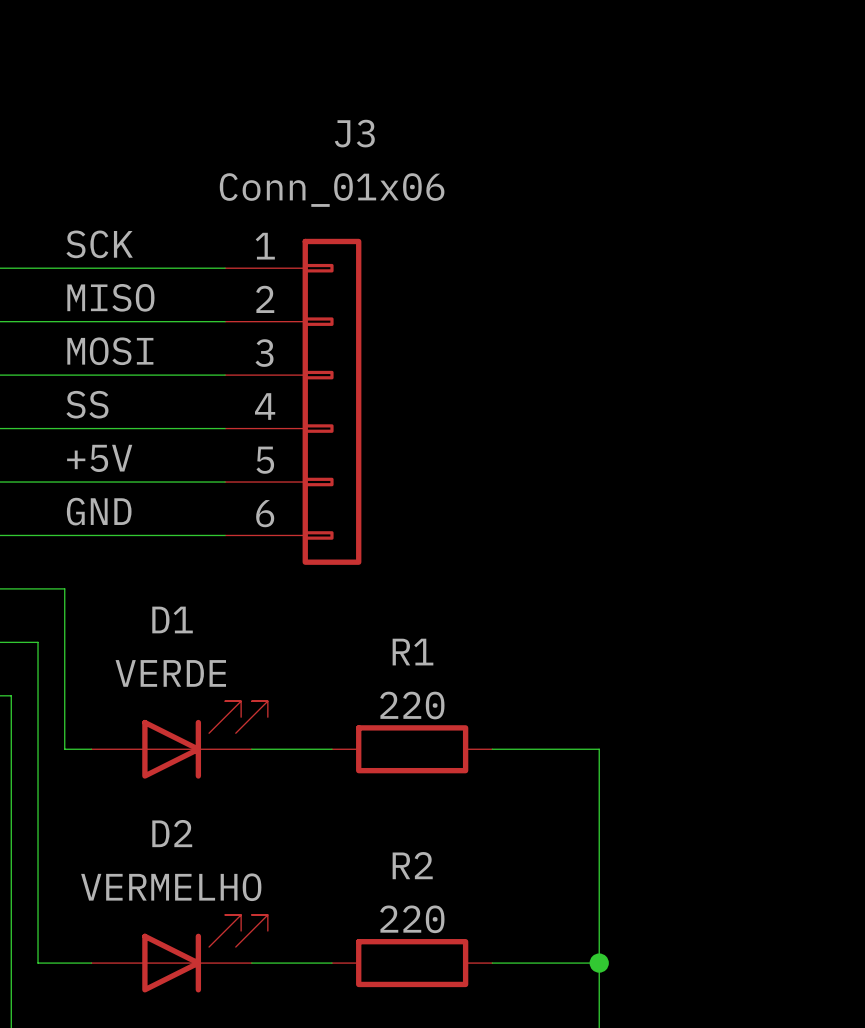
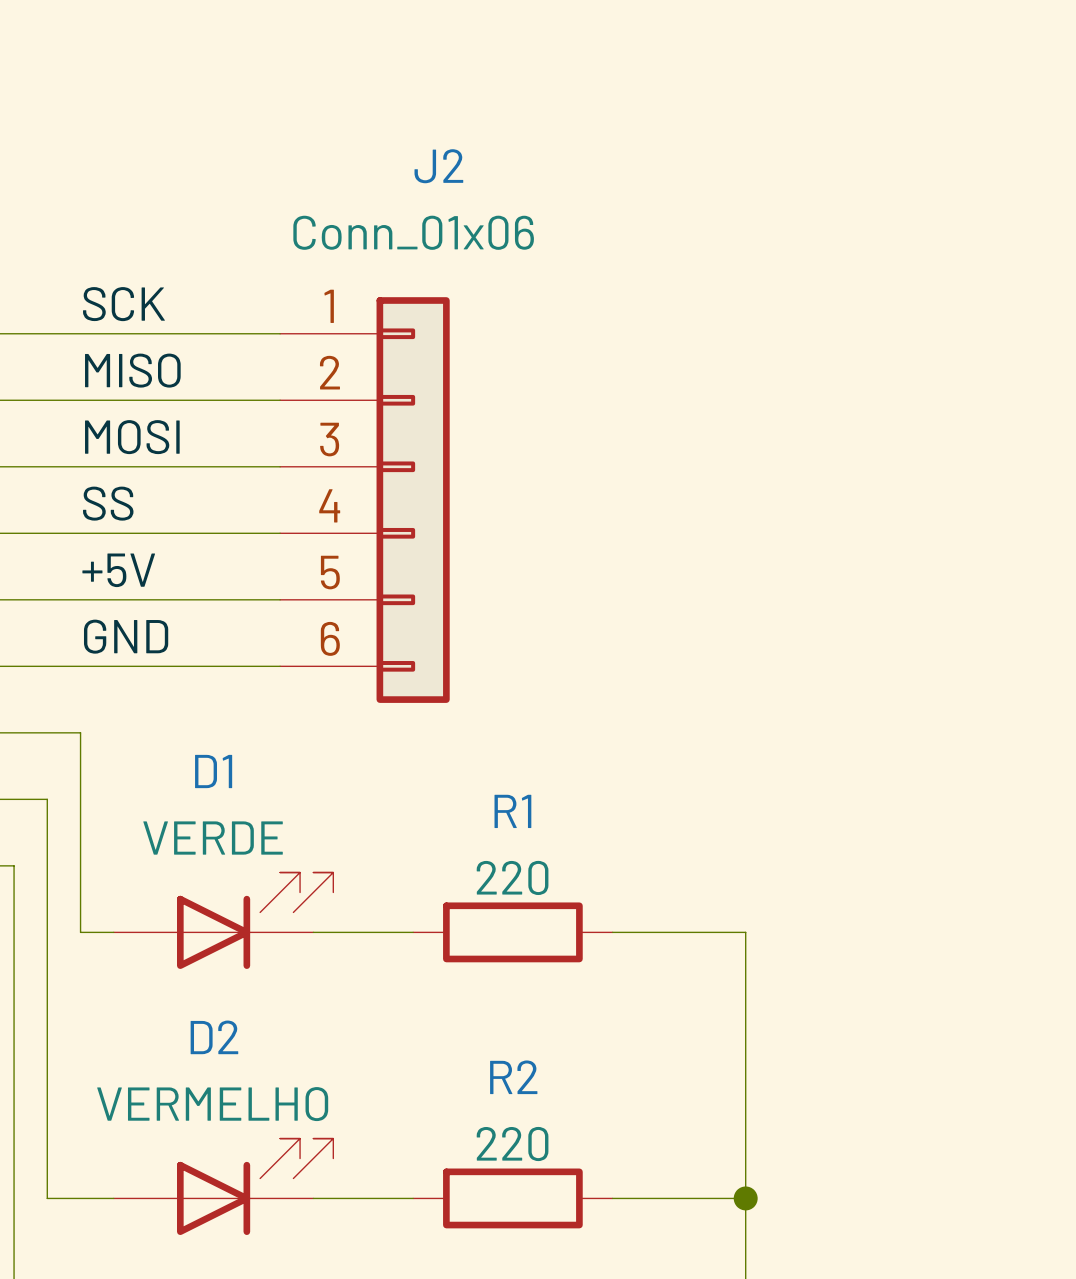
J3 name: J3 (354, 133) -> J2 (438, 166)

